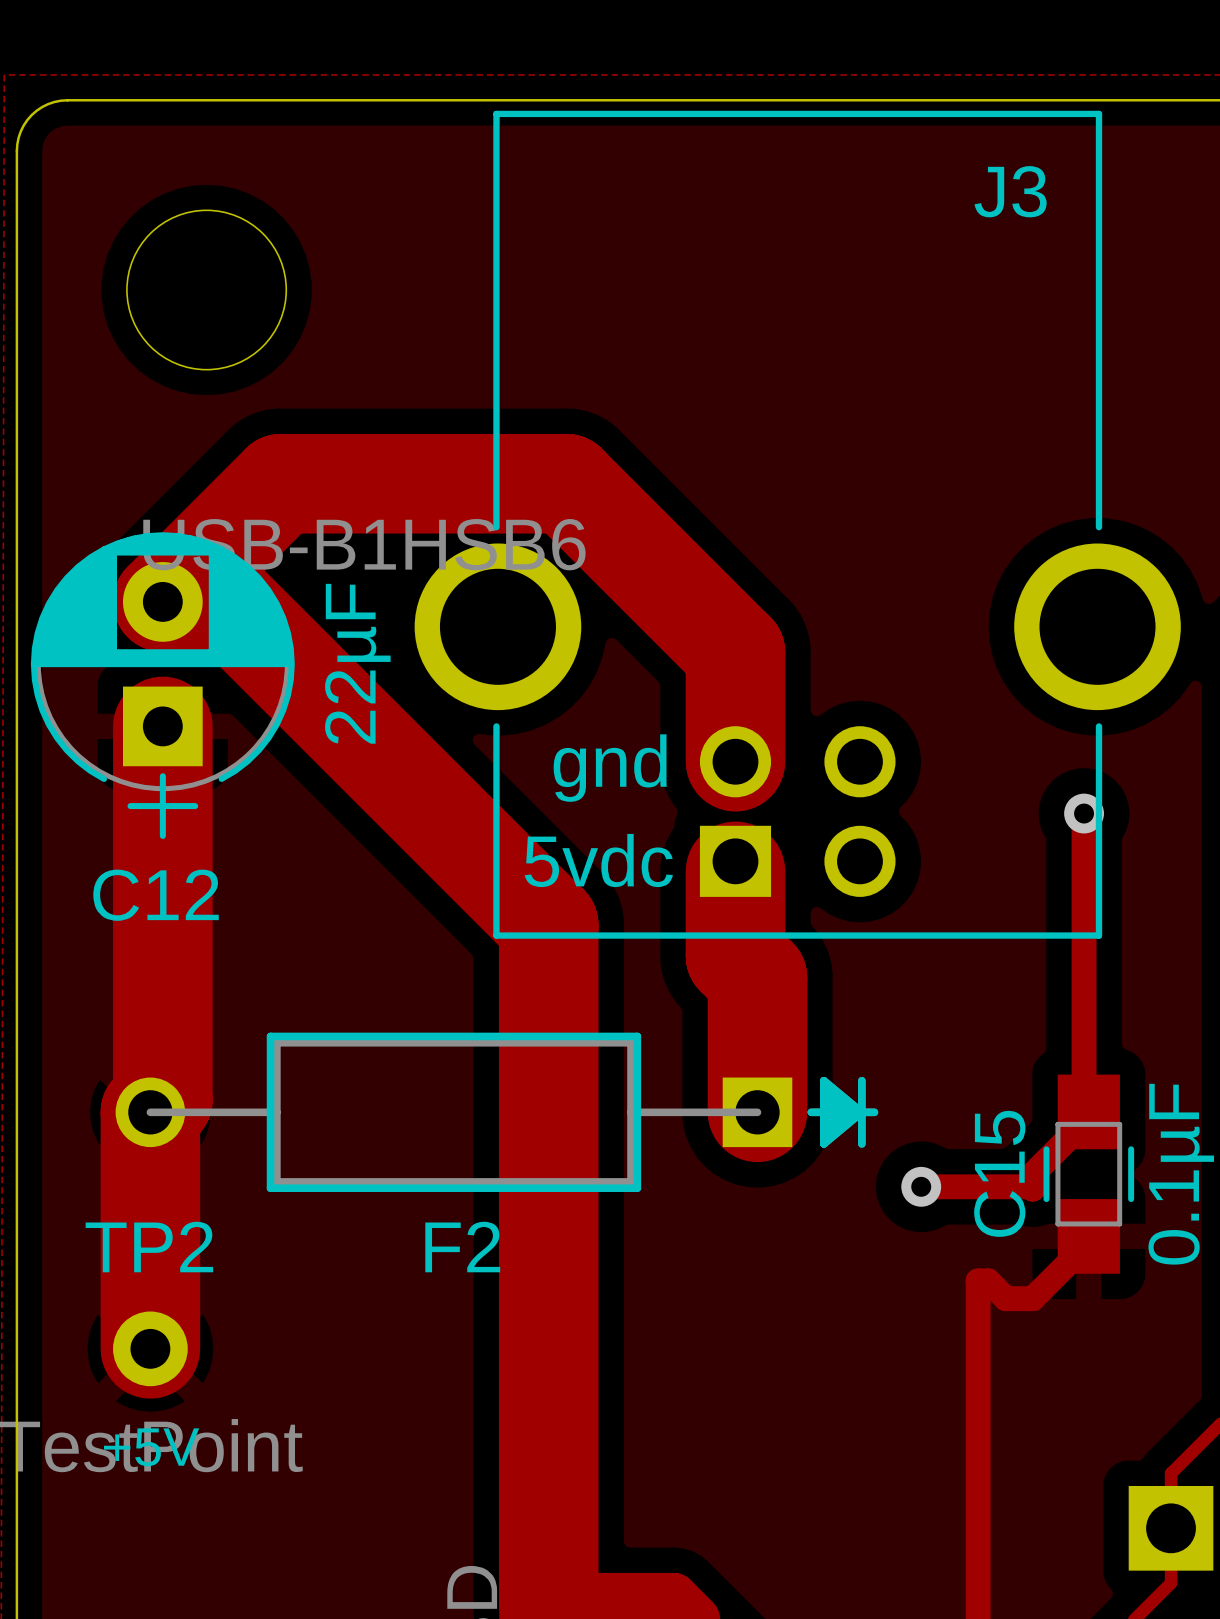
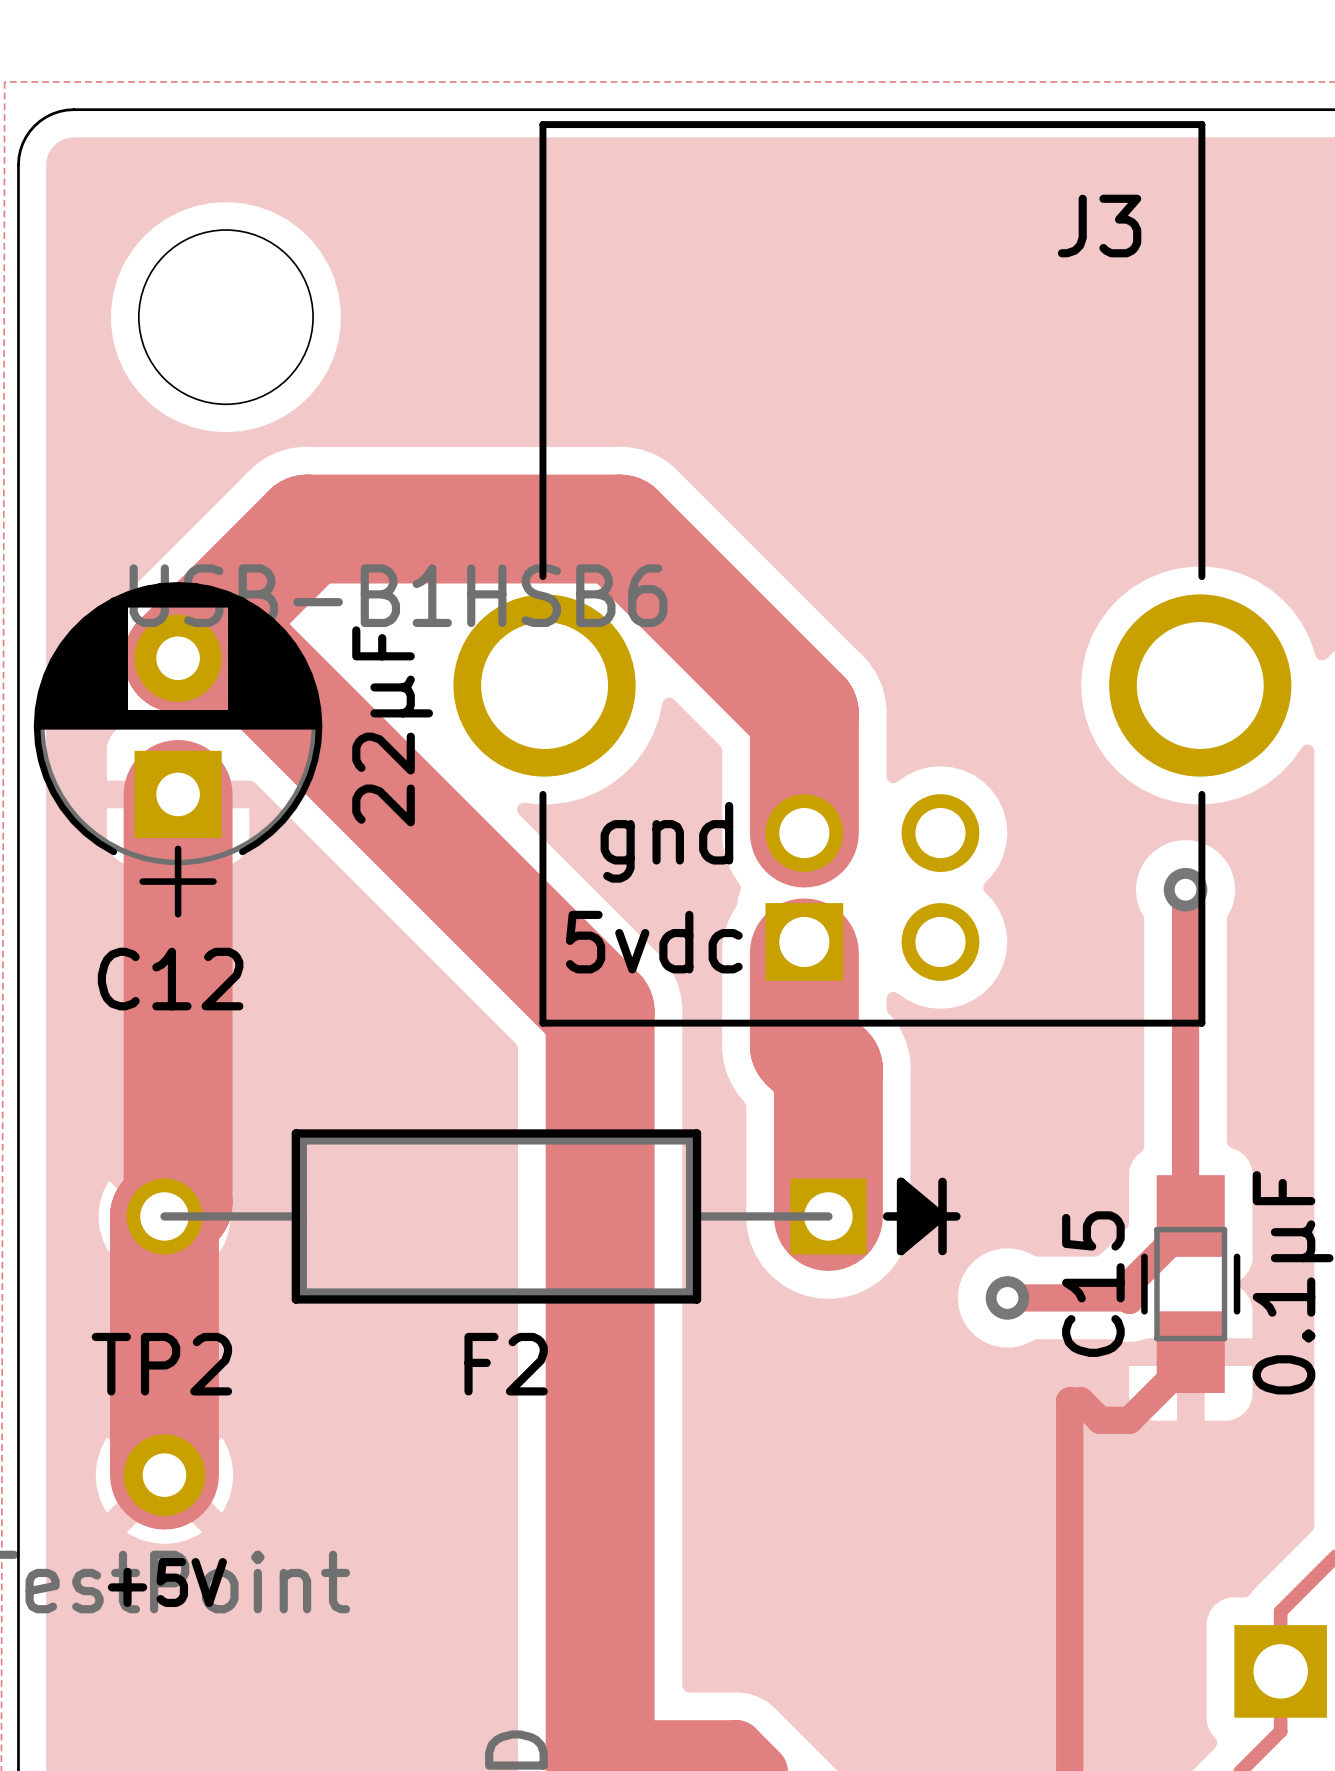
J3 name position: J3 (1010, 191) -> J3 (1099, 226)

